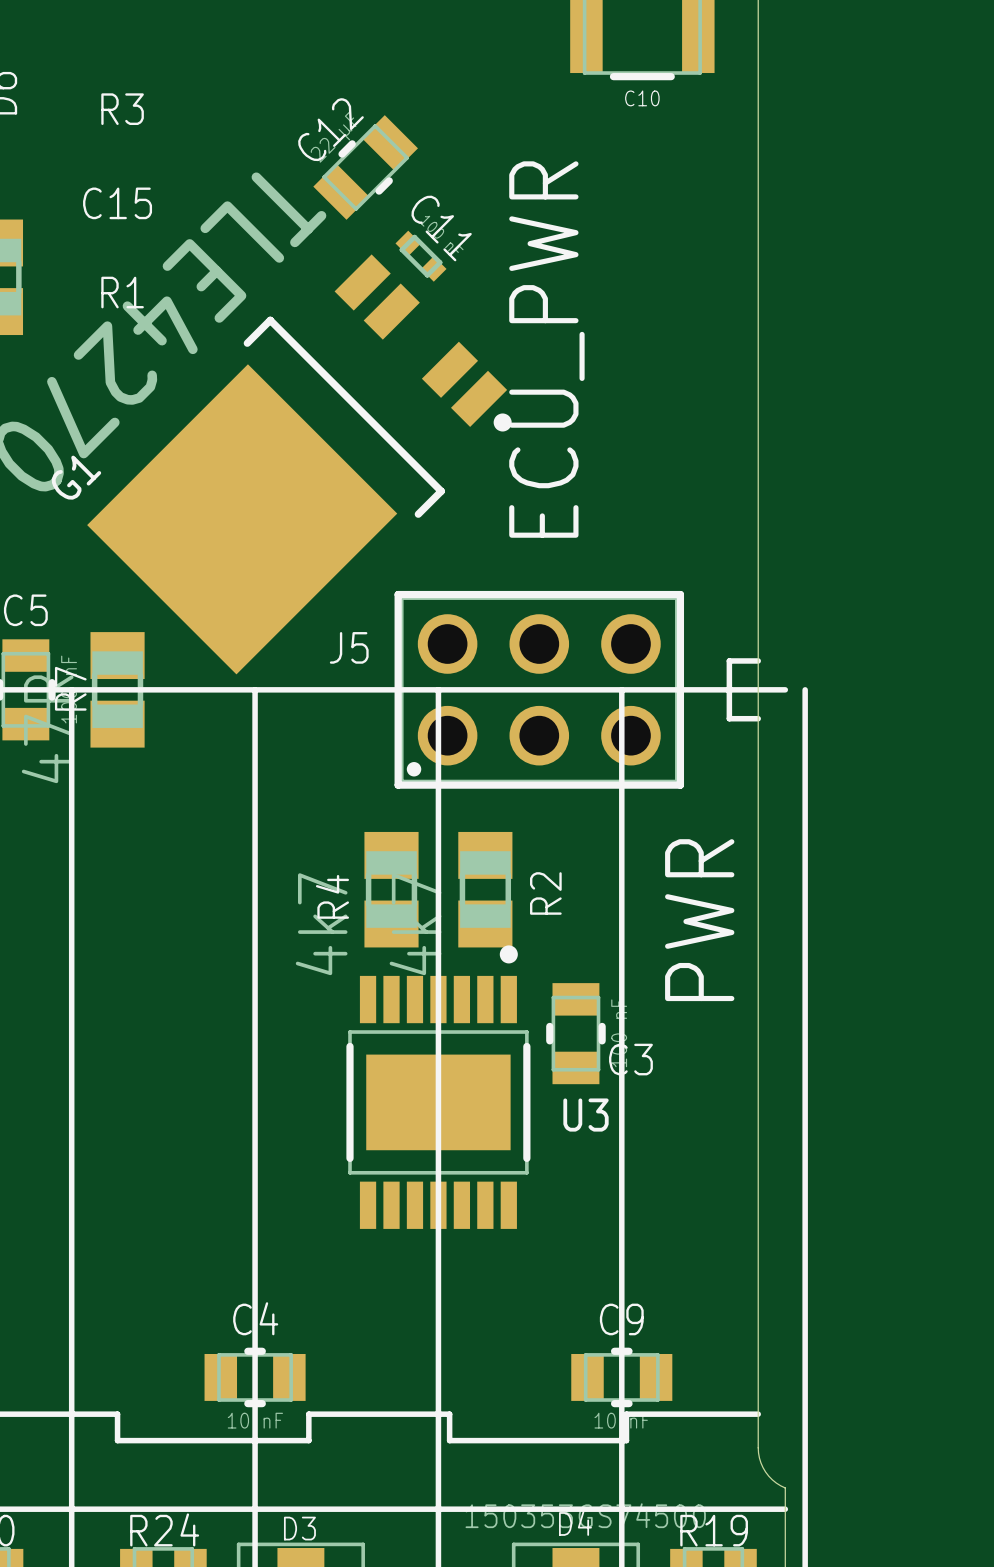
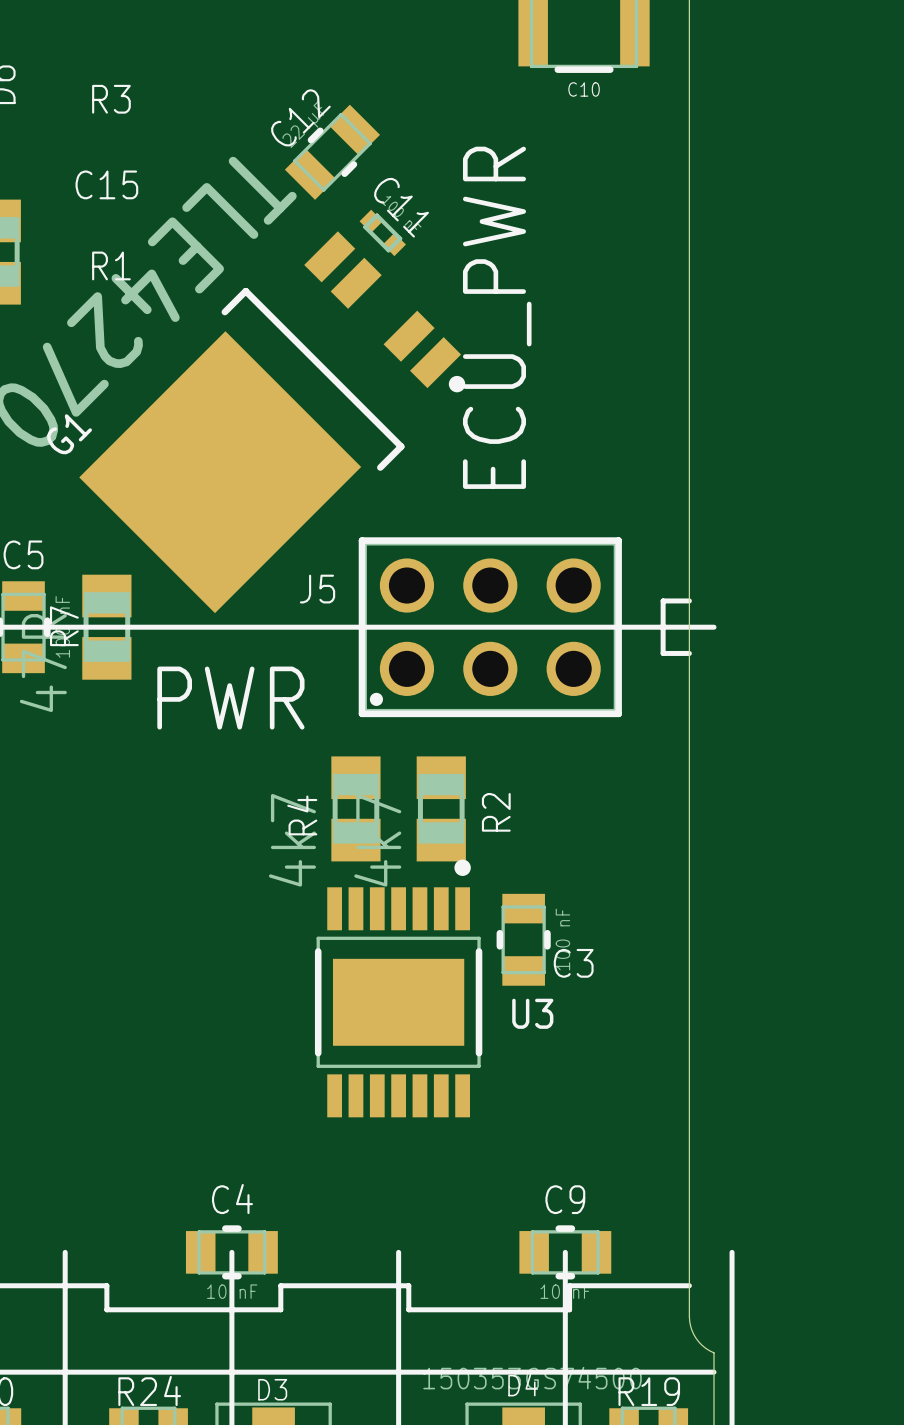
line: (71, 689) (71, 1377) -> none
line: (255, 689) (255, 1377) -> none
line: (438, 689) (438, 1377) -> none
line: (621, 689) (621, 1377) -> none
line: (805, 689) (805, 1377) -> none
text rotation: 0° (699, 920) -> 90° clockwise (230, 698)
text position: PWR (699, 920) -> PWR (230, 698)

